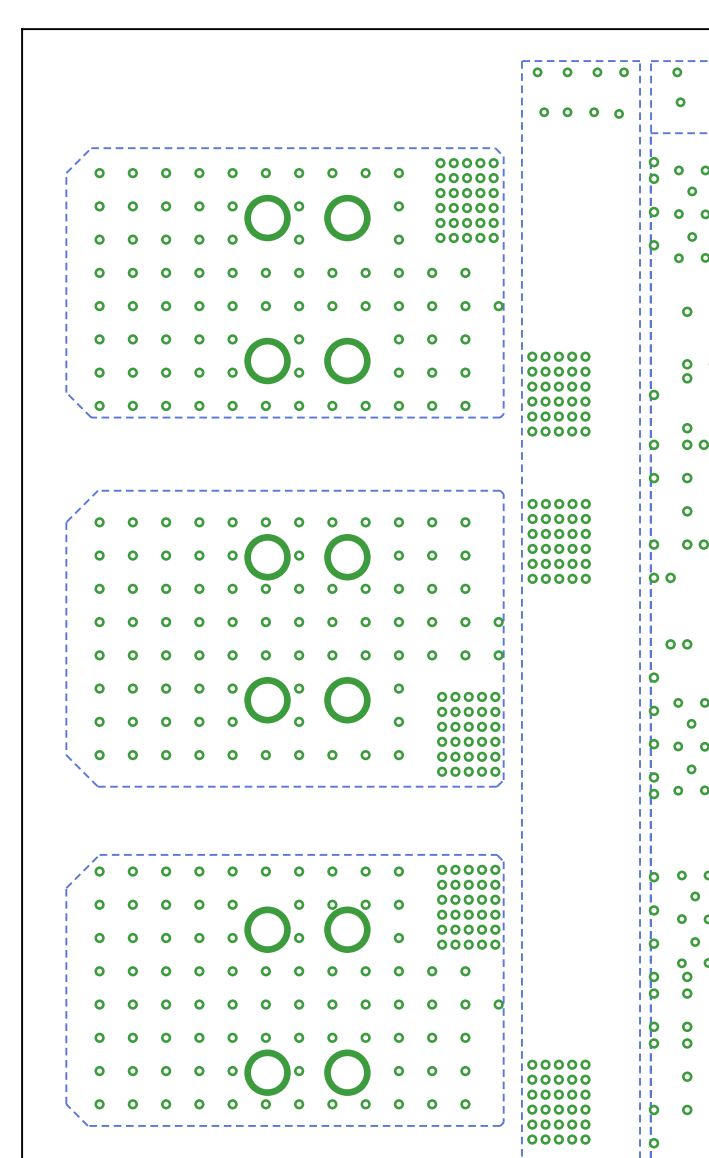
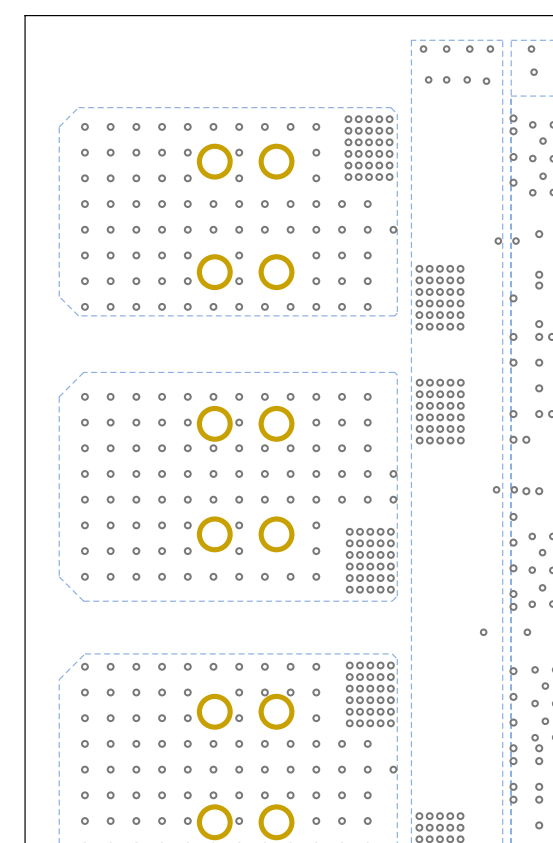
via: none -> (498, 241)
via: none -> (516, 241)
via: none -> (496, 489)
via: none -> (514, 489)
via: none -> (483, 632)
via: none -> (527, 632)

